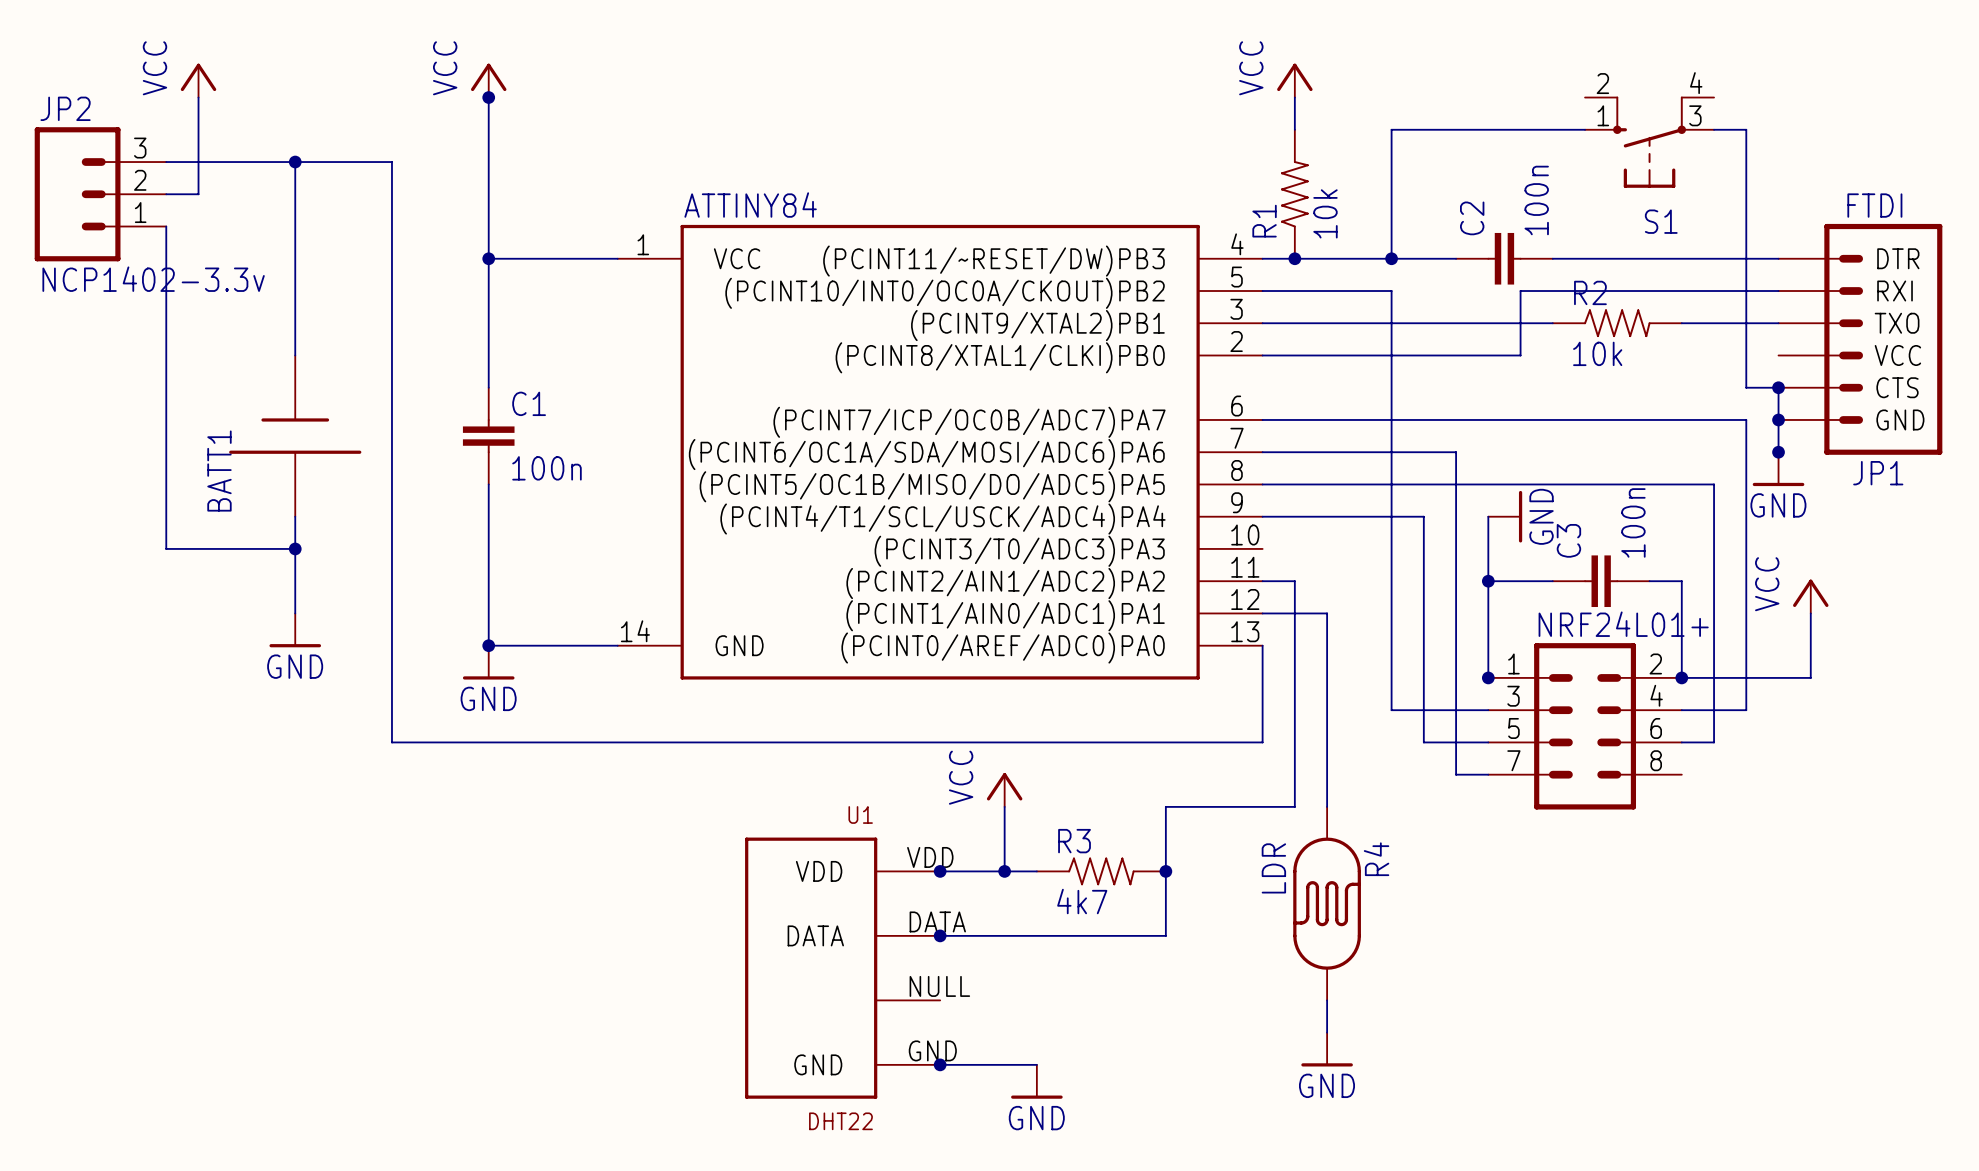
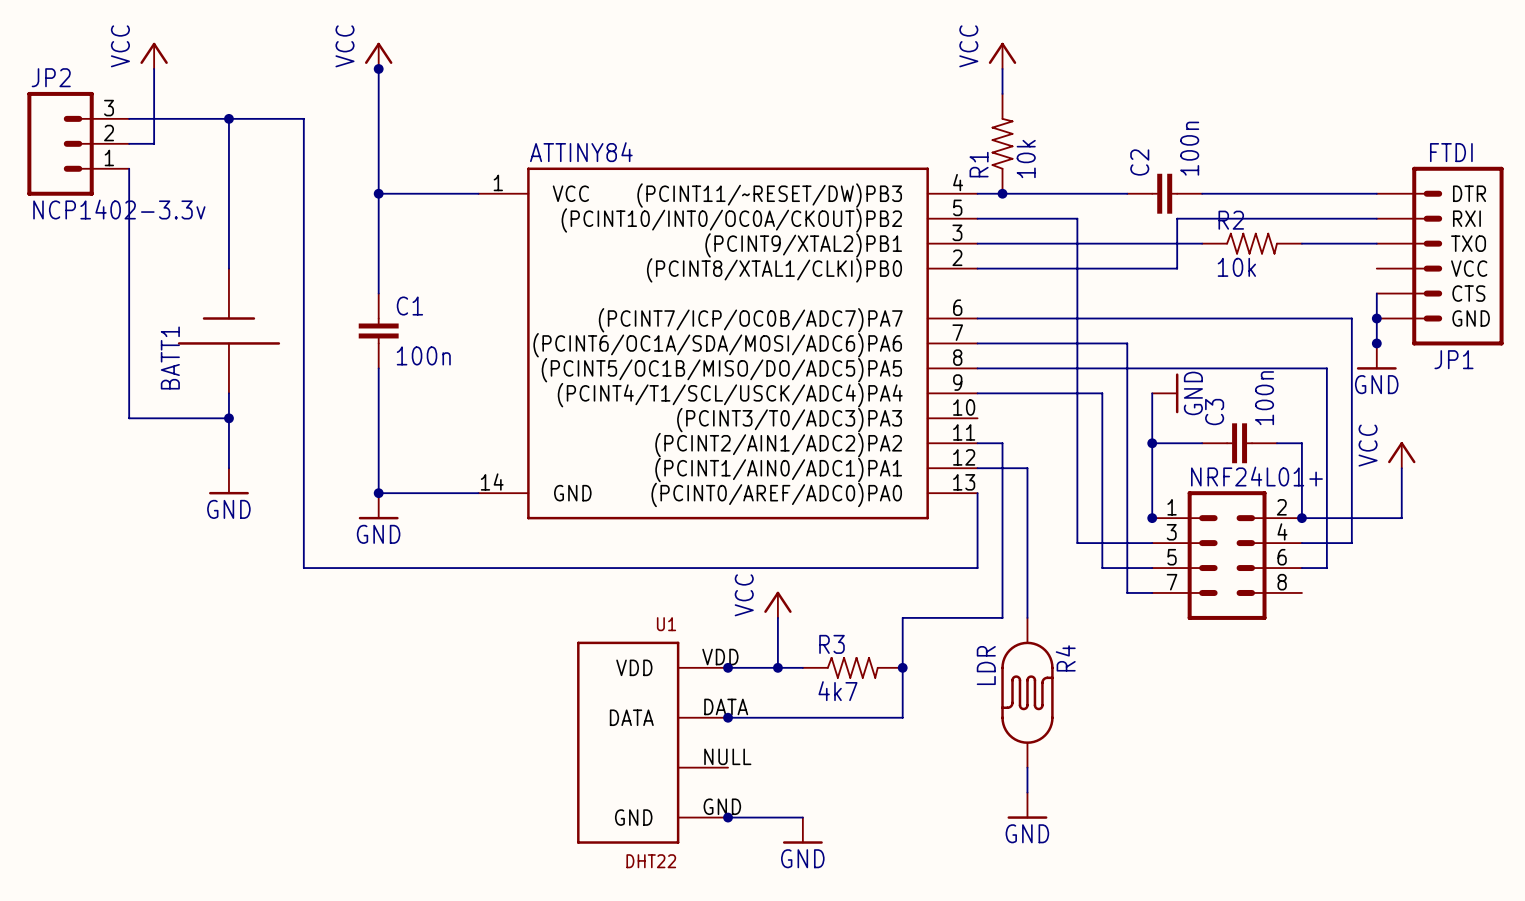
wire: (1585, 129) (1391, 129) (1391, 258) -> none
wire: (1714, 129) (1746, 129) (1746, 387) (1778, 387) -> none
S1: (1649, 142) -> none
junction: (1391, 258) -> none
junction: (1778, 387) -> none

